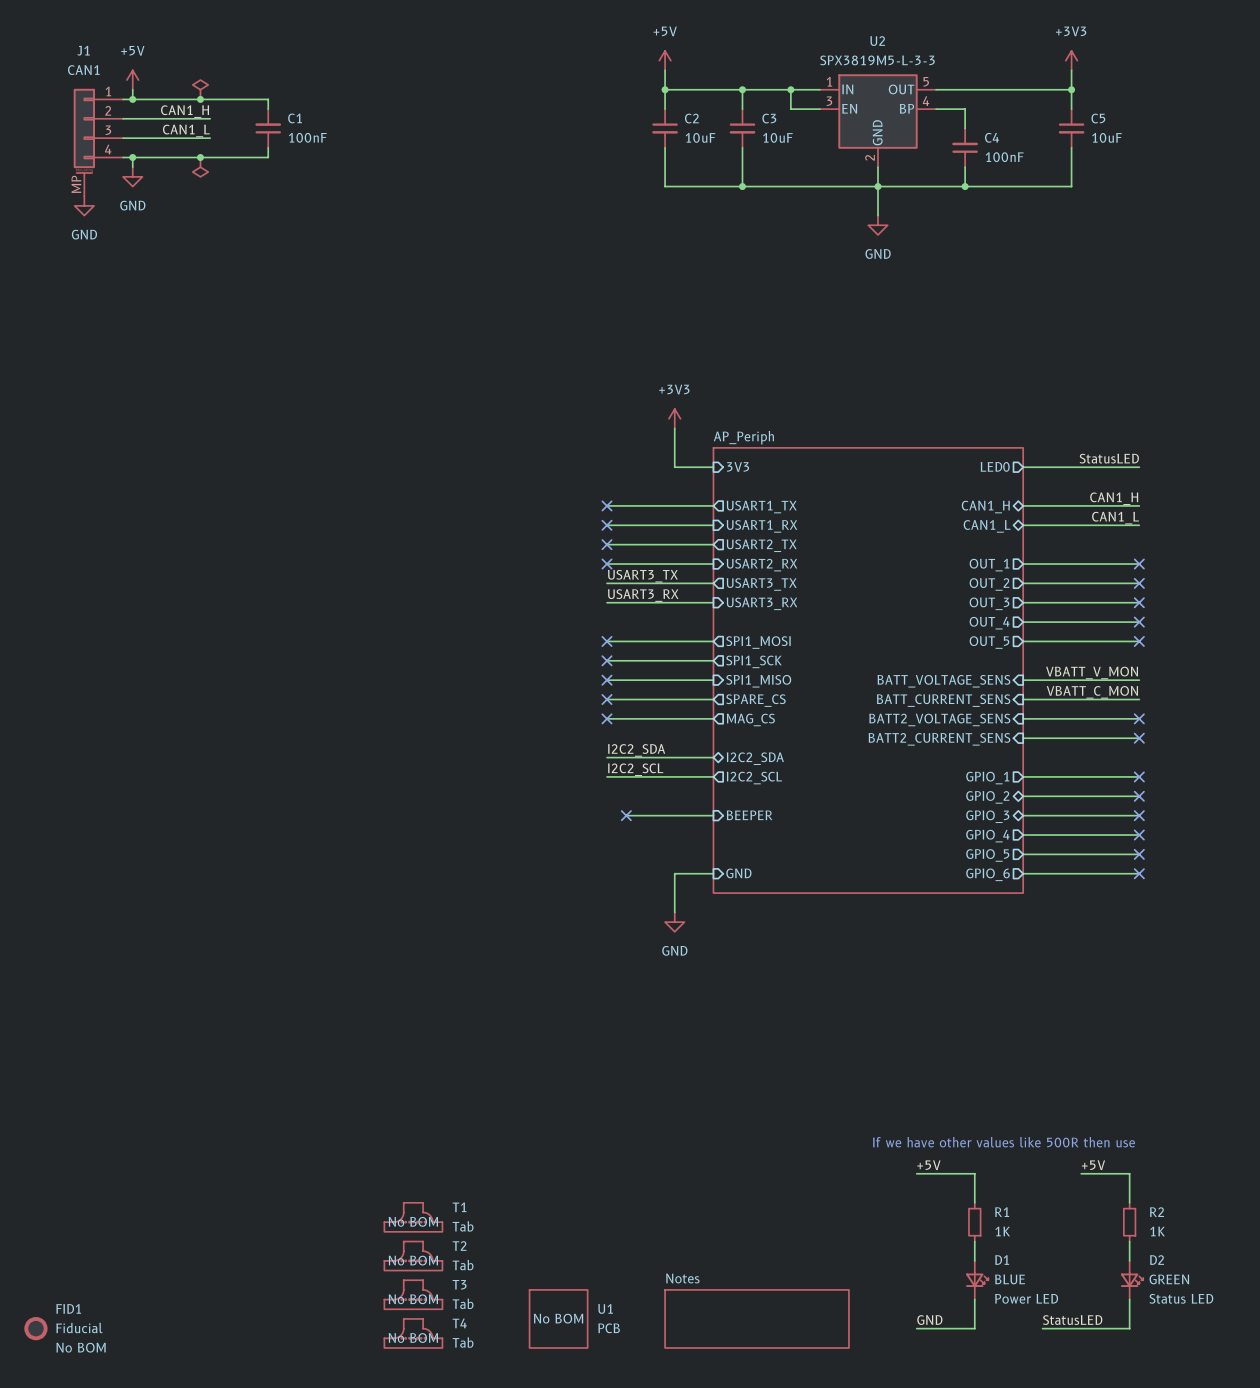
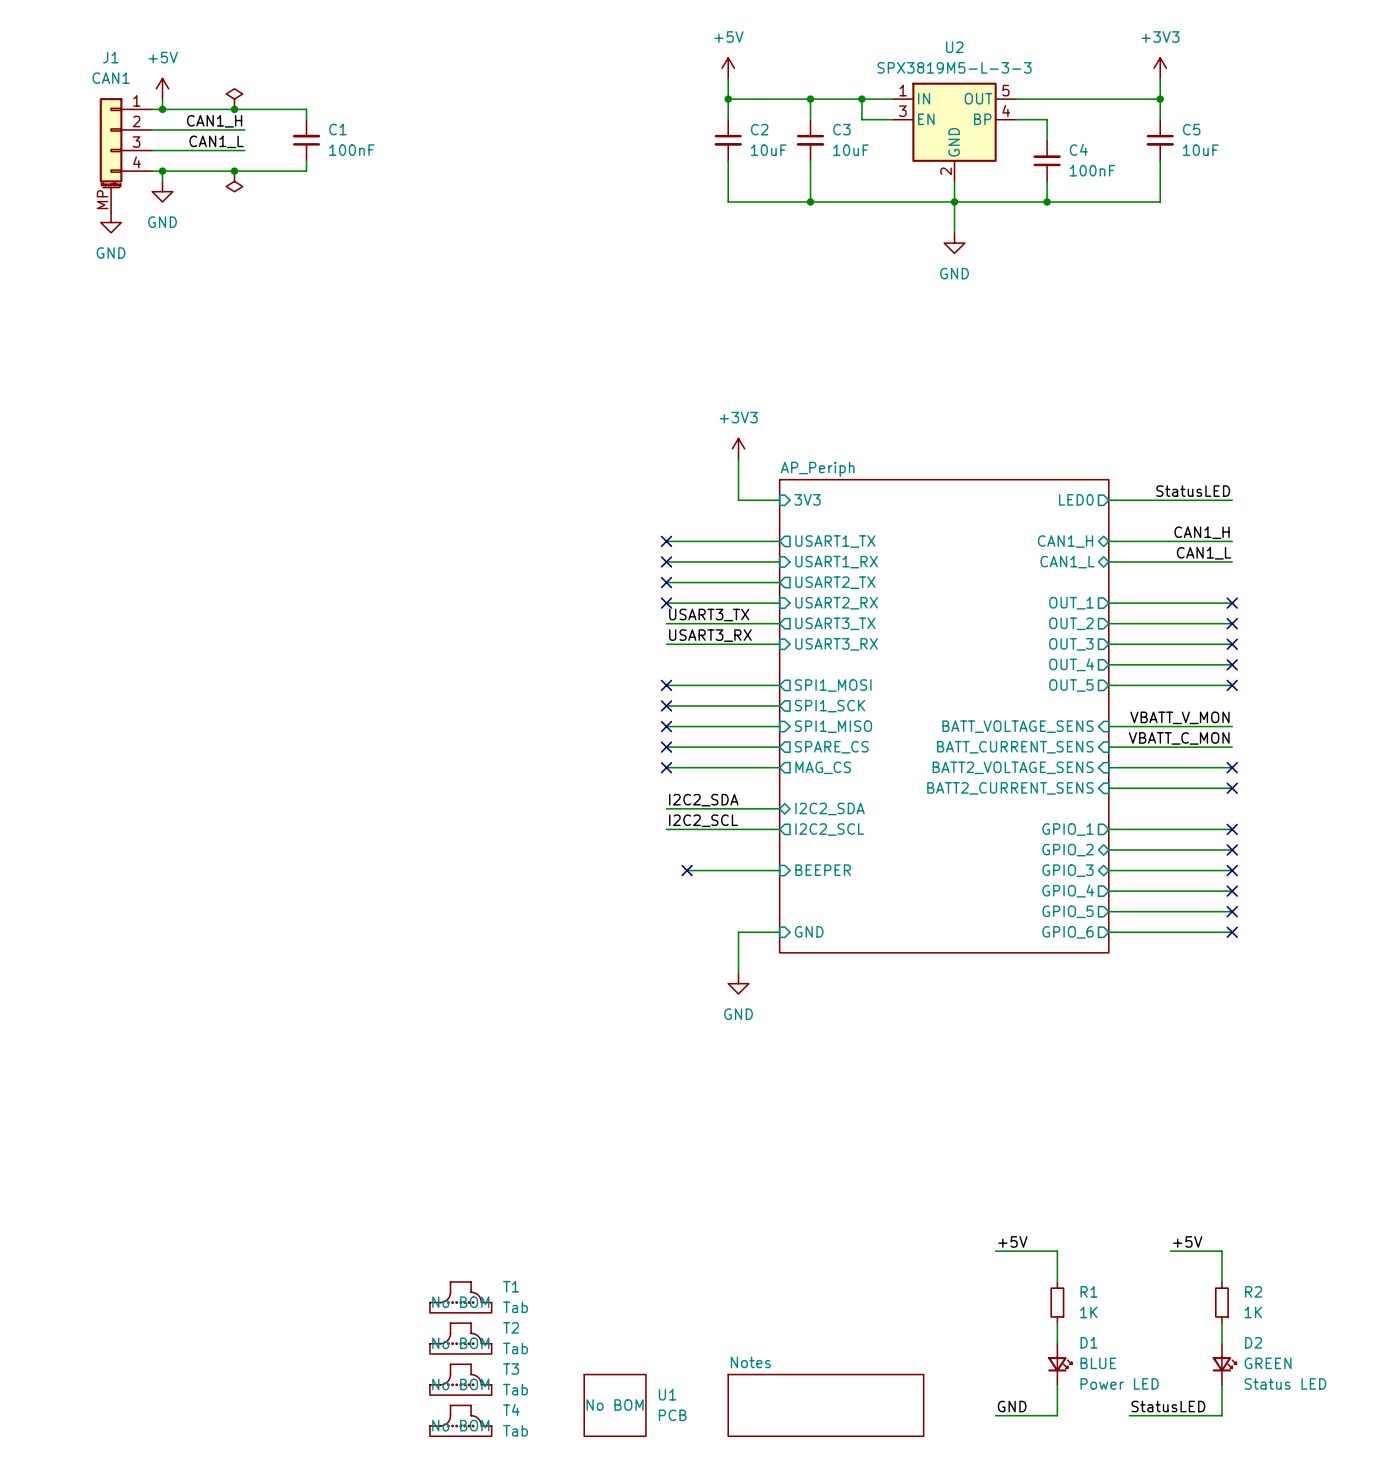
text: If we have other values like 500R then use (1003, 1142) -> none
FID1: Fiducial (35, 1328) -> none

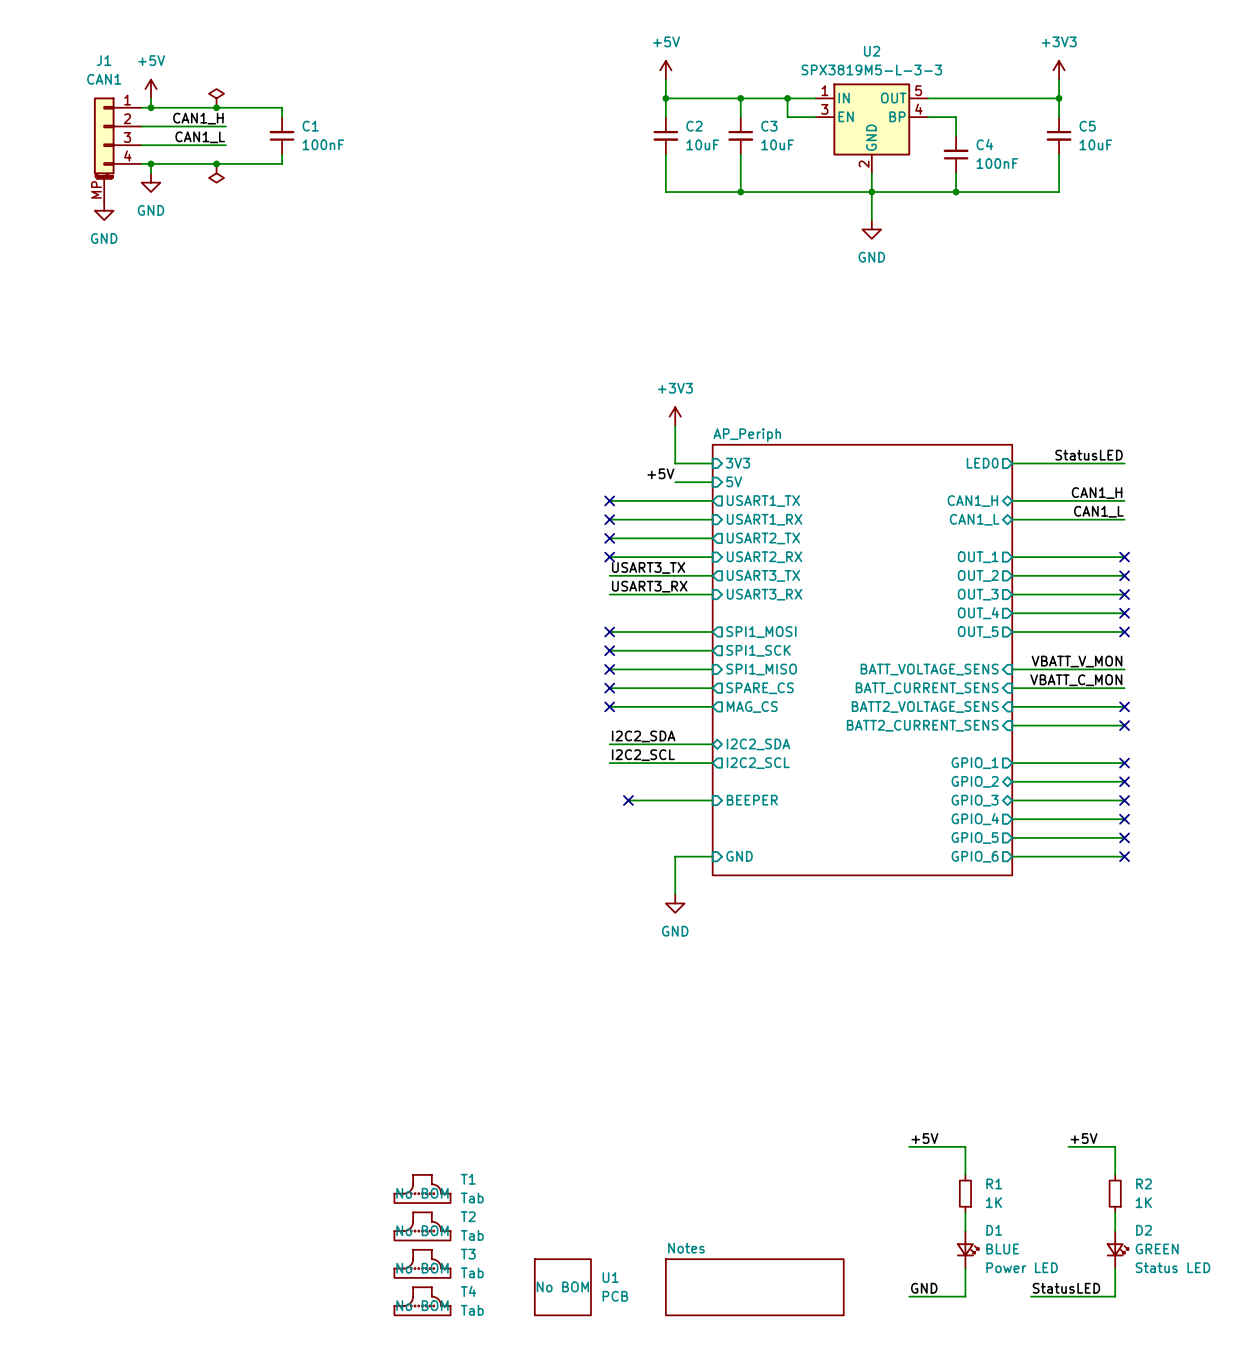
label: none -> +5V (660, 473)
wire: none -> (675, 482) (712, 482)
sheet pin: none -> 5V (734, 481)

